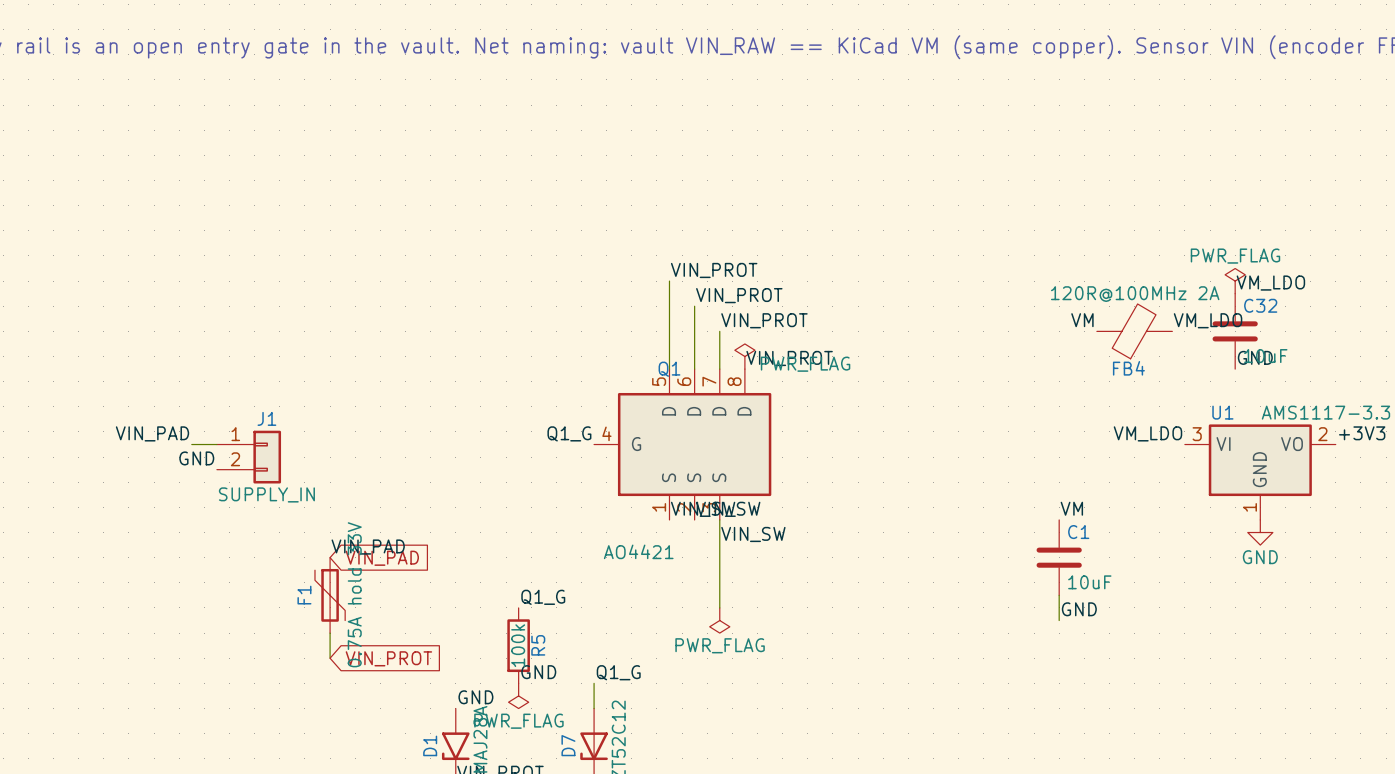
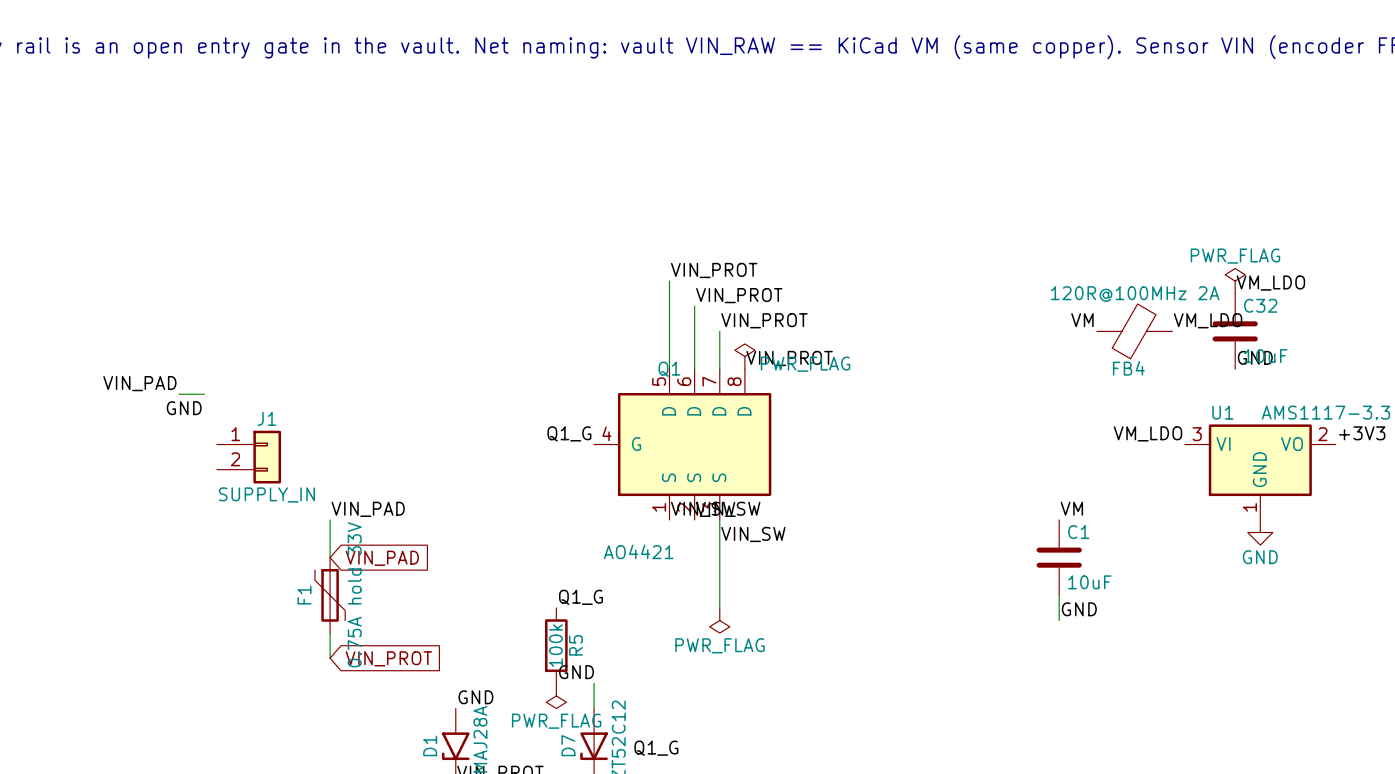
label position: VIN_PAD (152, 433) -> VIN_PAD (139, 383)
wire: (191, 444) (216, 444) -> (179, 394) (204, 394)
label position: GND (196, 458) -> GND (184, 408)
wire: none -> (330, 519) (330, 557)
label position: VIN_PAD (368, 547) -> VIN_PAD (368, 509)
label position: Q1_G (543, 597) -> Q1_G (580, 597)
R5 position: (518, 645) -> (556, 645)
label position: GND (538, 672) -> GND (576, 672)
label: Q1_G (618, 672) -> none
power symbol position: PWR_FLAG (518, 695) -> PWR_FLAG (556, 695)
label: none -> Q1_G (656, 748)

